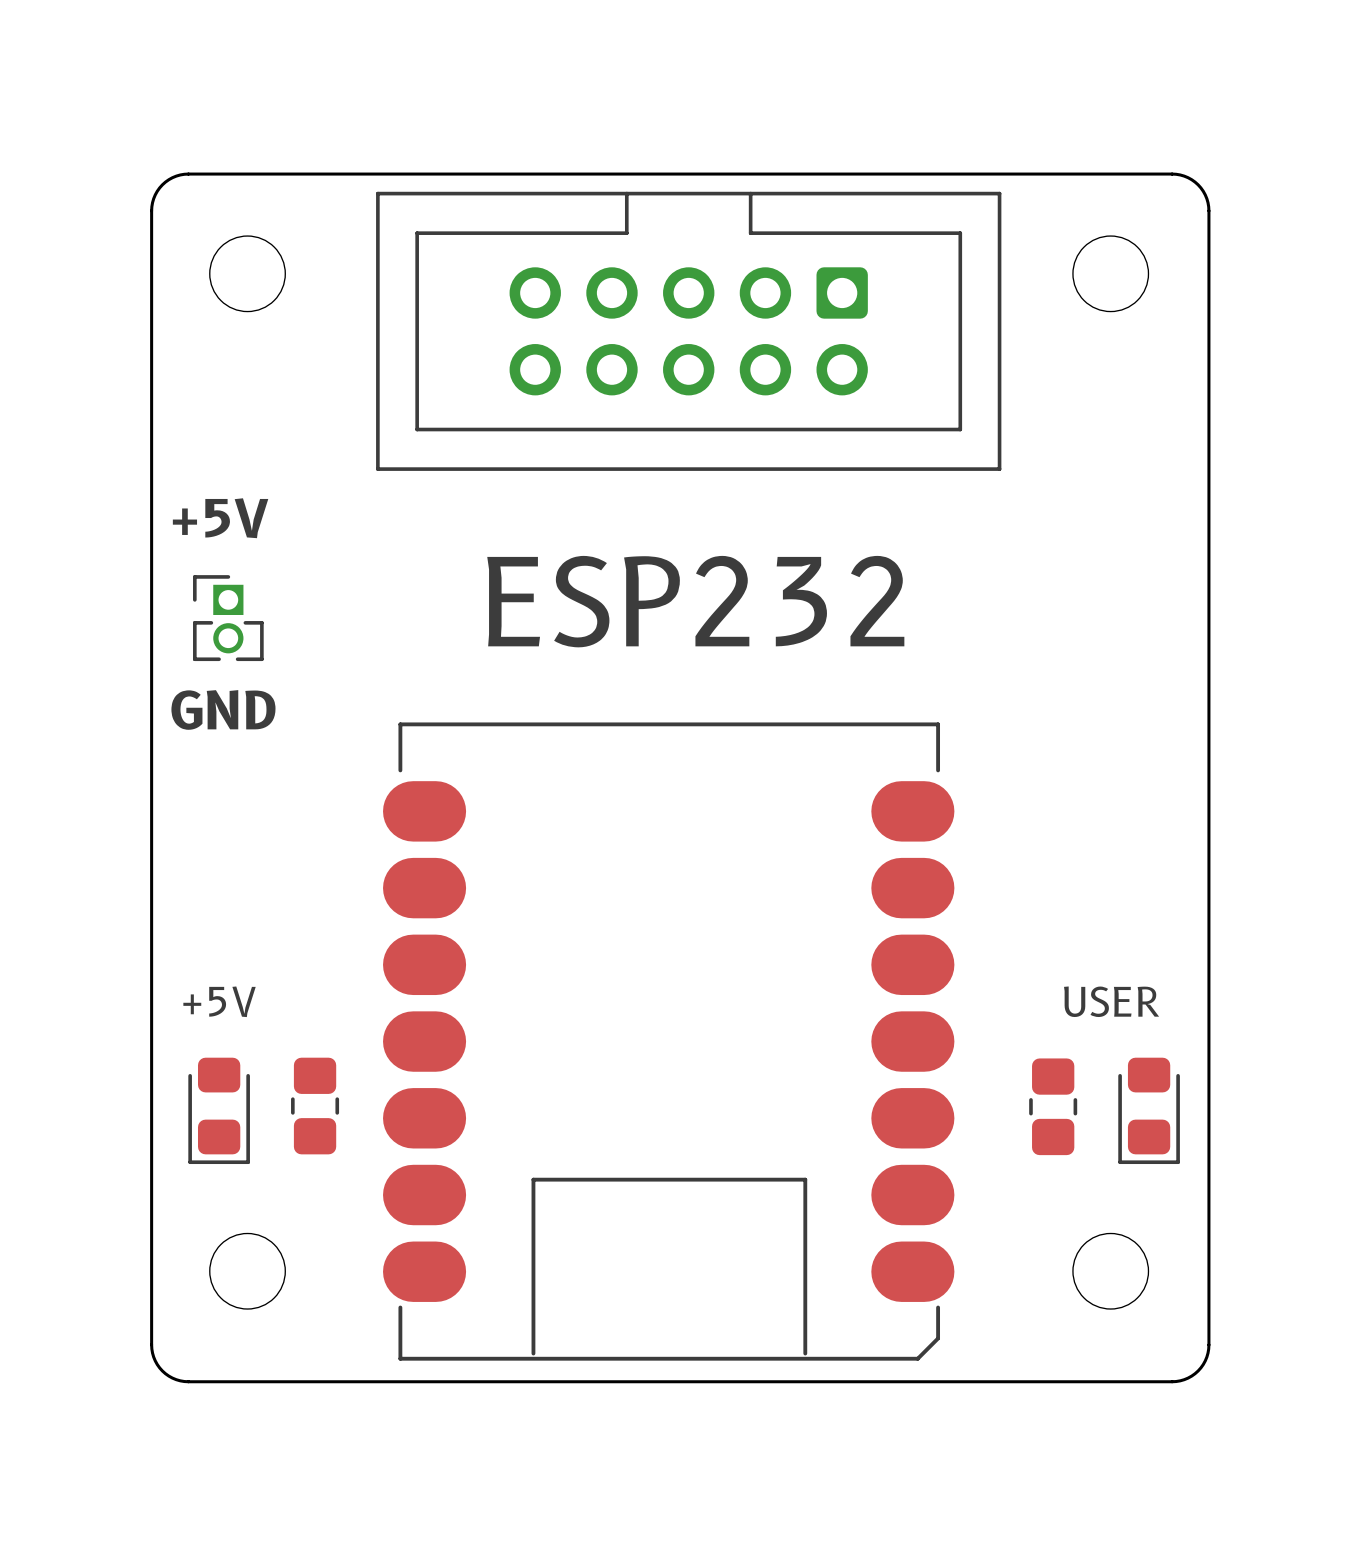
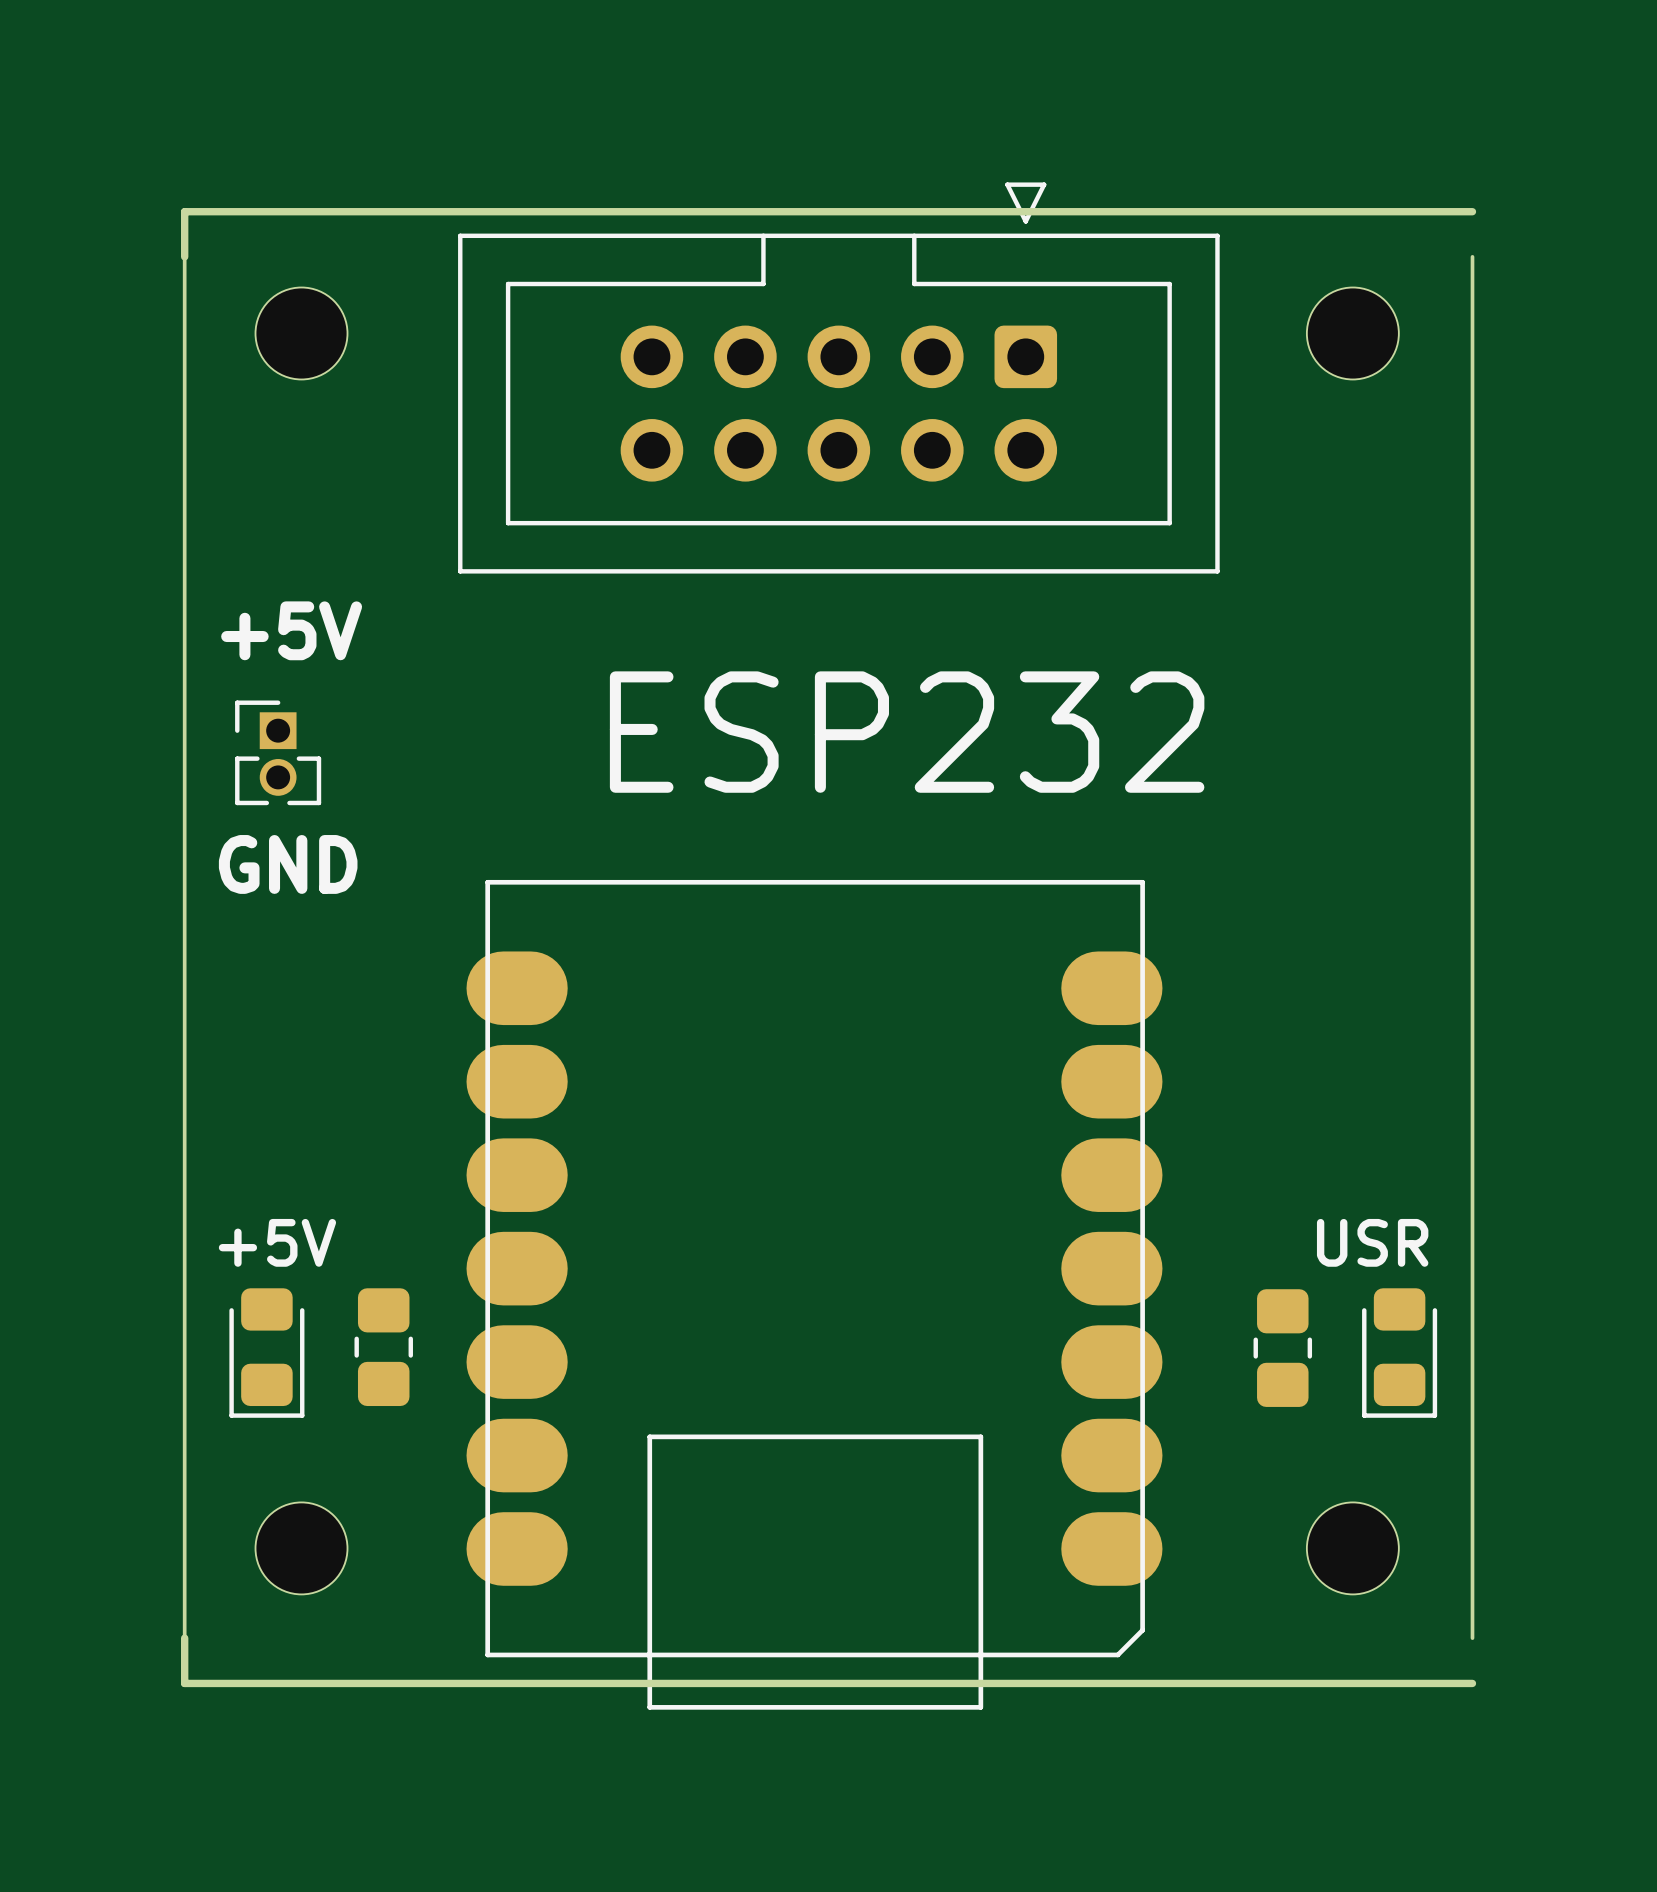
part footprint: [376, 191, 1002, 471] -> [458, 182, 1220, 574]
board edge: (151, 210) (153, 198) (162, 184) (176, 176) (188, 174) (1172, 174) (1184, 176) (1198, 184) (1205, 194) (1208, 210) -> (184, 256) (184, 211) (1472, 211)
part footprint: [383, 722, 955, 1361] -> [466, 879, 1163, 1710]
part text: +5V (219, 1001) -> none
part text: USER (1111, 1001) -> none
text: none -> +5V (277, 1242)
text: none -> USR (1372, 1242)
board edge: (151, 1344) (155, 1360) (162, 1370) (176, 1379) (188, 1381) (1172, 1381) (1188, 1378) (1198, 1370) (1206, 1357) (1208, 1344) -> (184, 1638) (184, 1683) (1472, 1683)

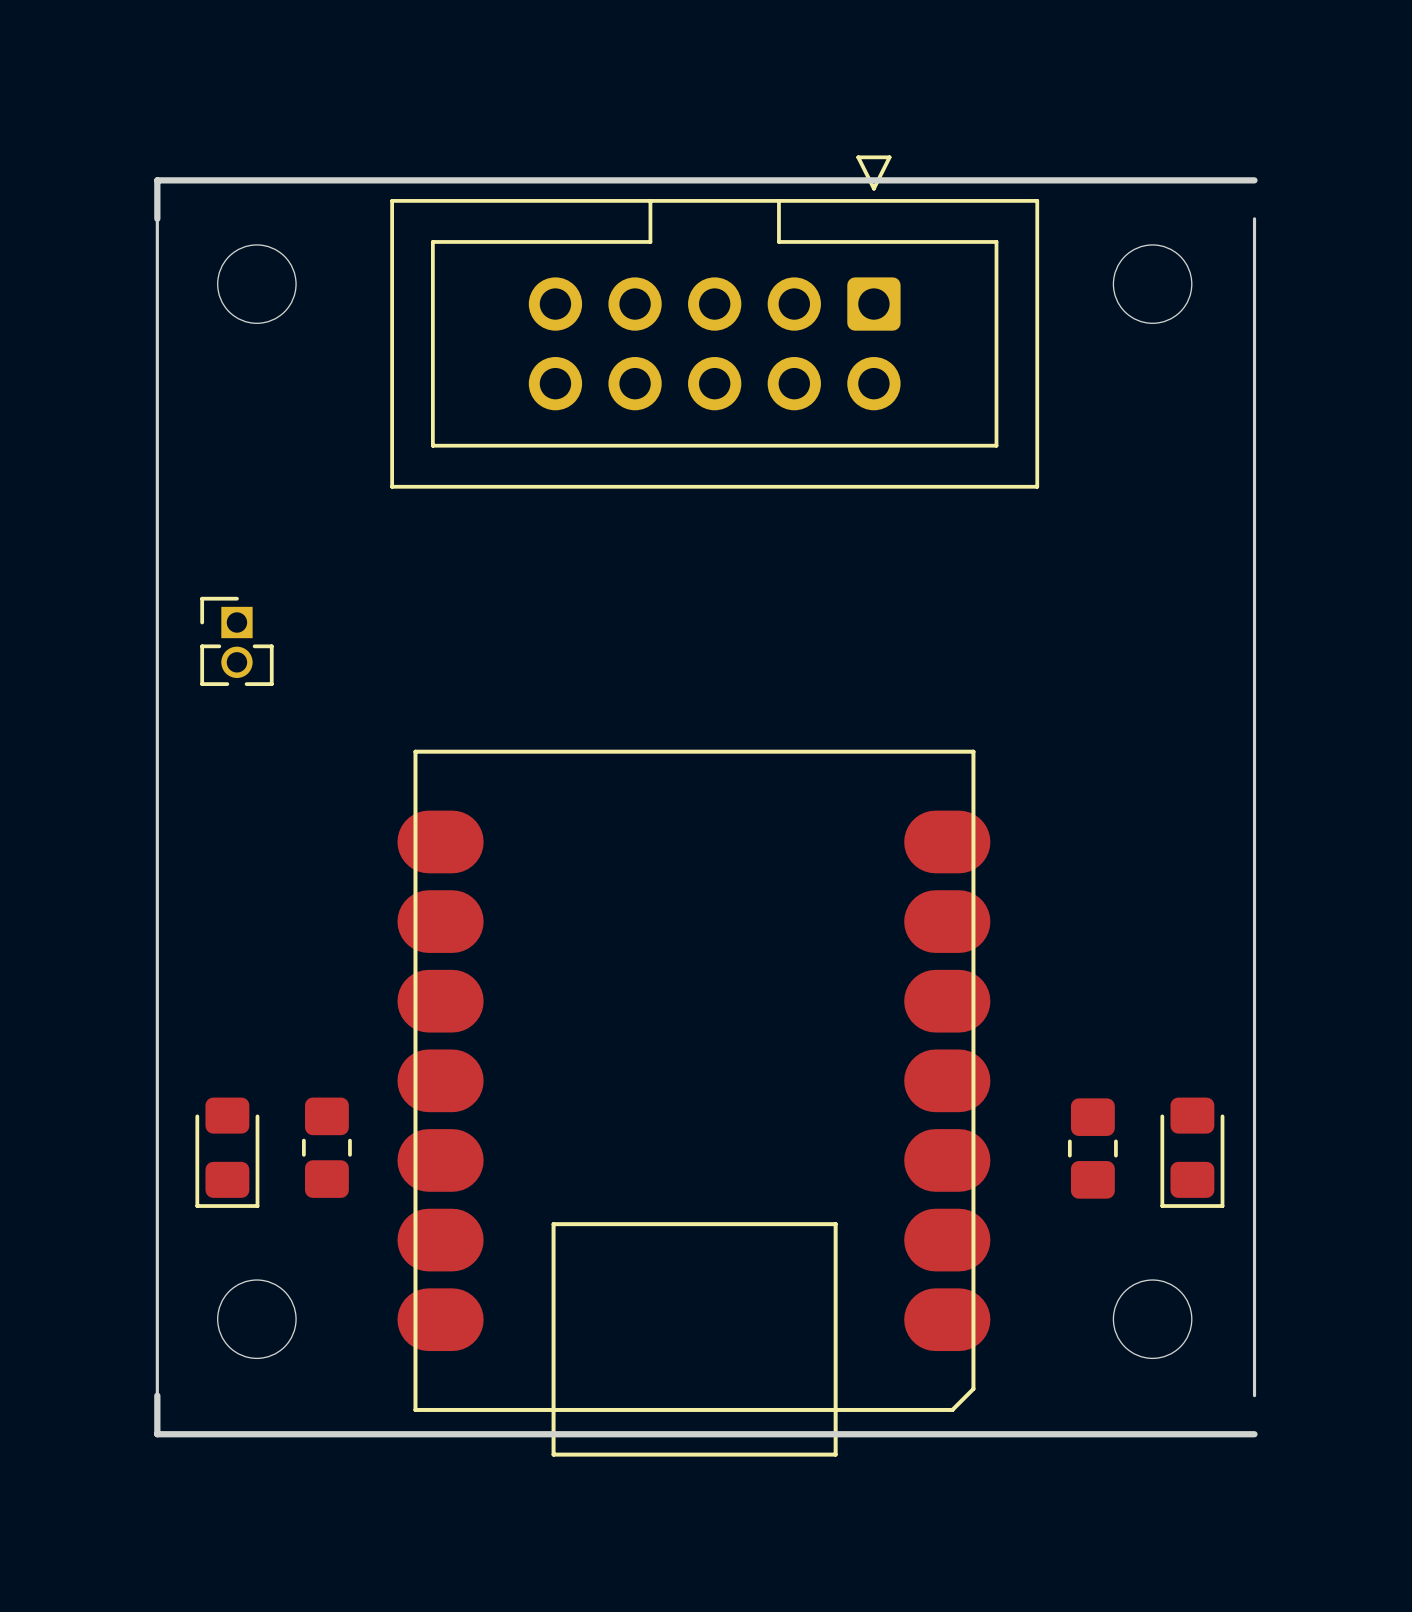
text: +5V (291, 630) -> none
text: ESP232 (907, 732) -> none
text: GND (288, 864) -> none
text: +5V (277, 1242) -> none
text: USR (1372, 1242) -> none

